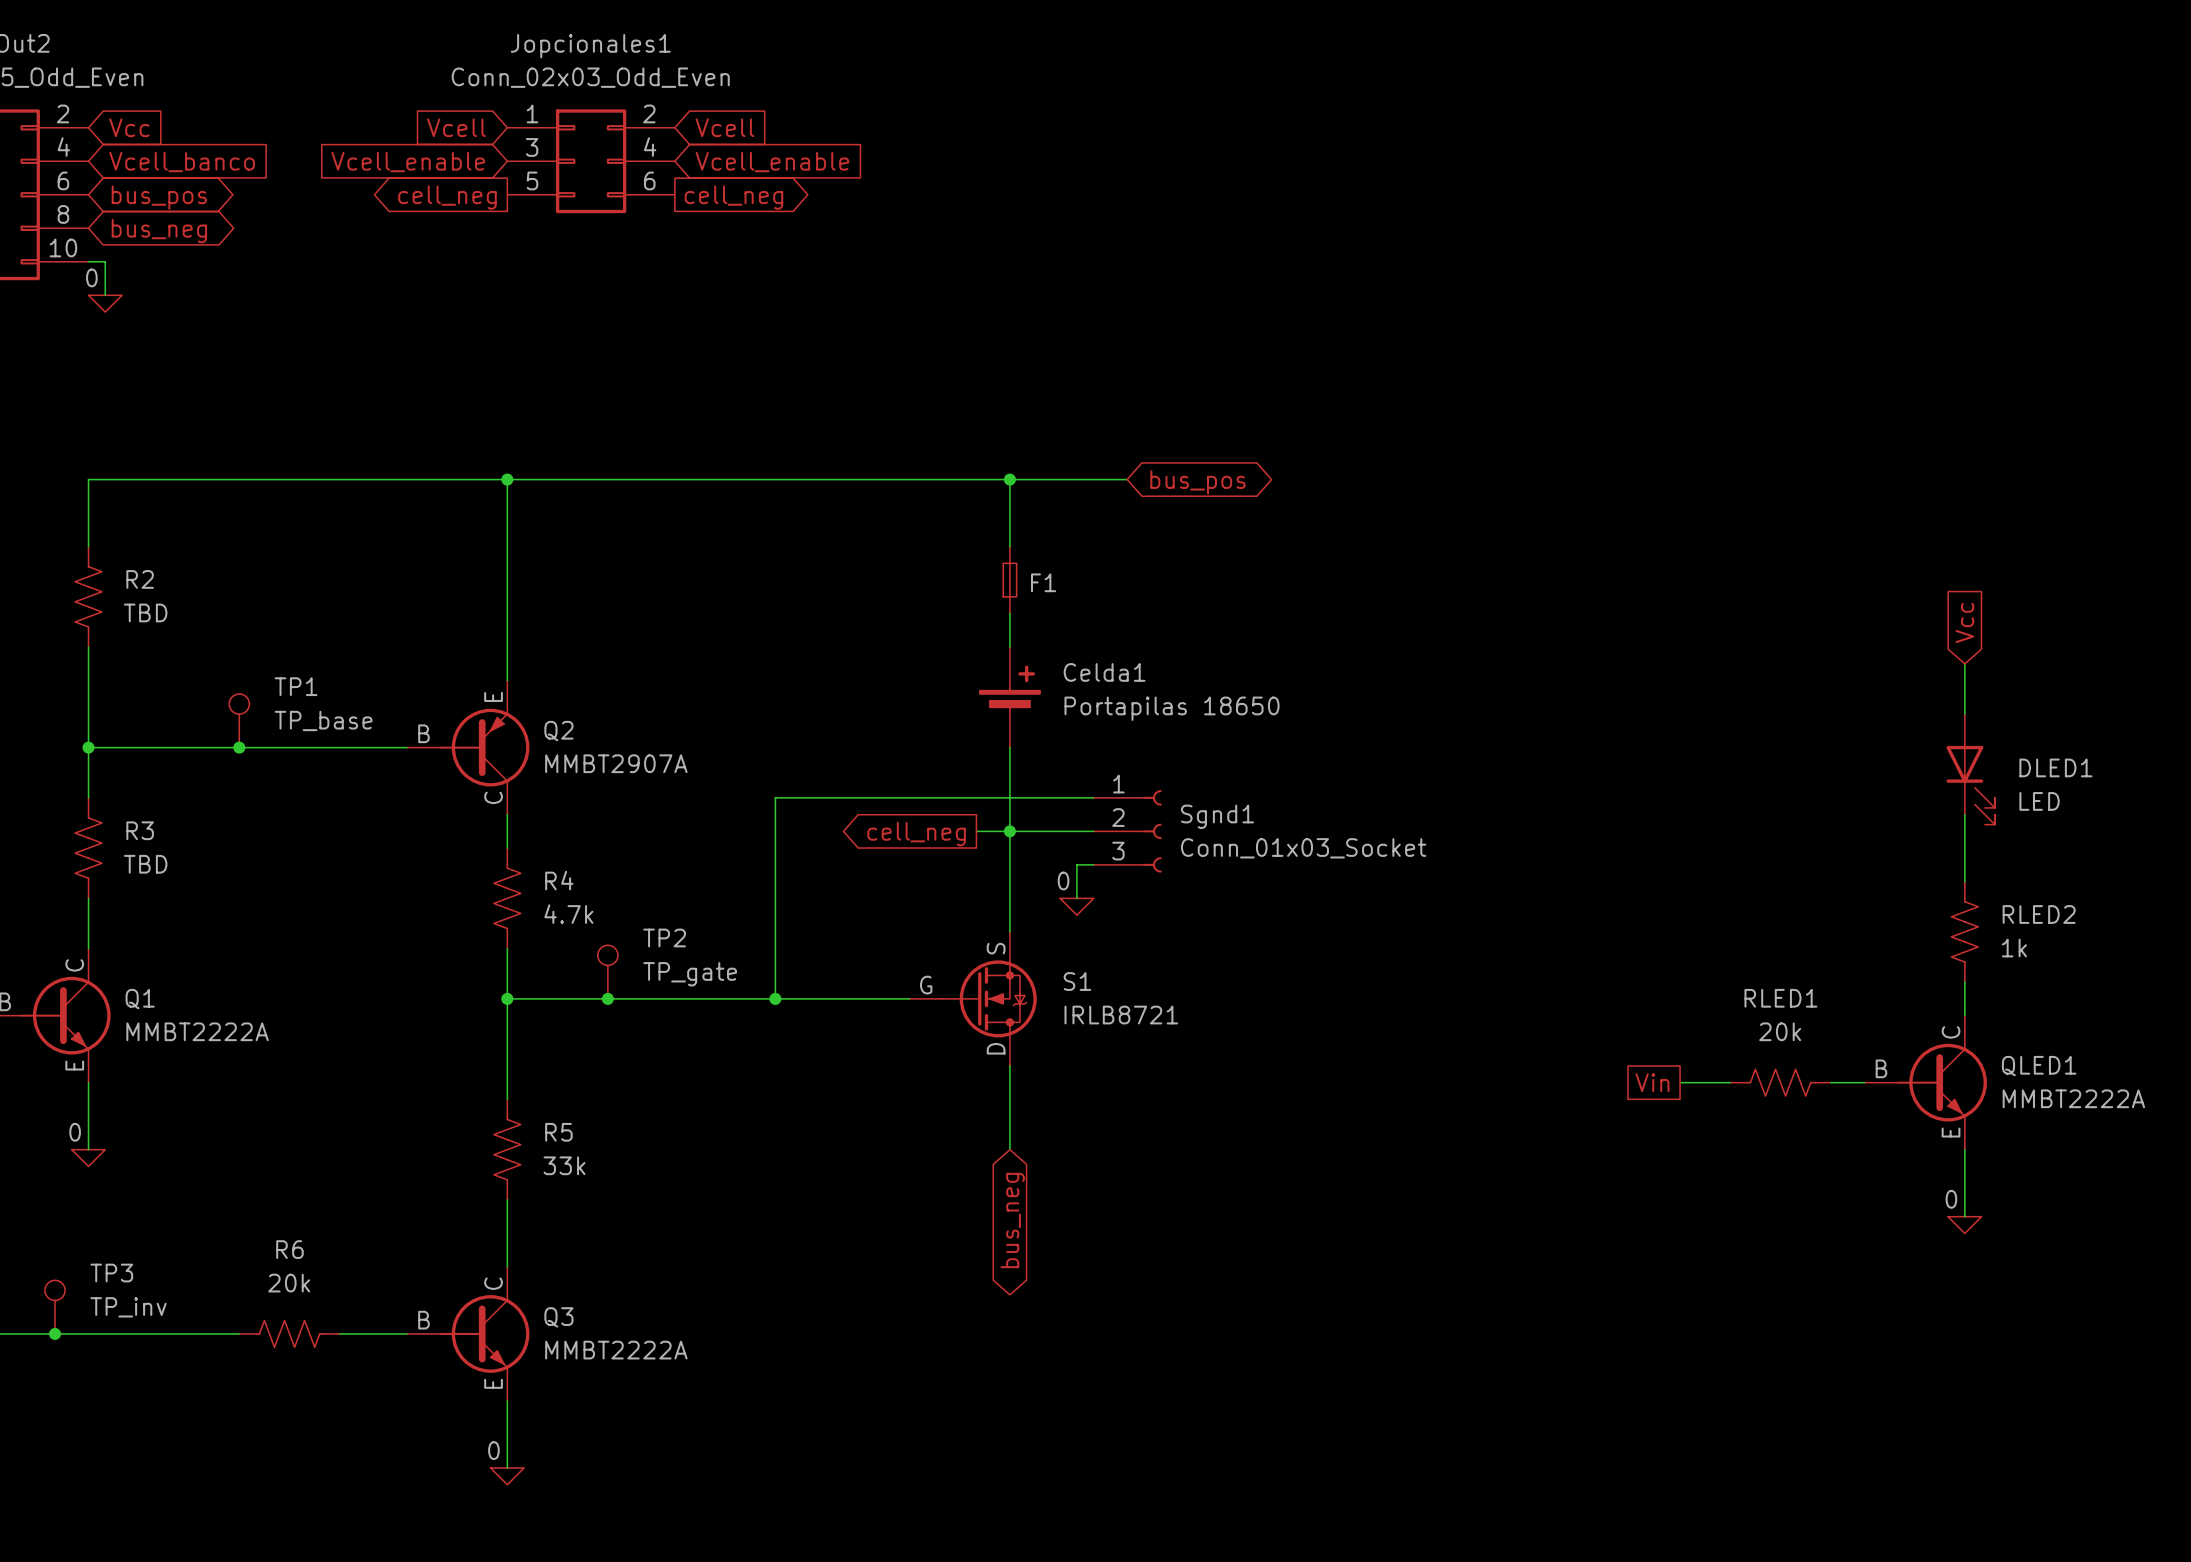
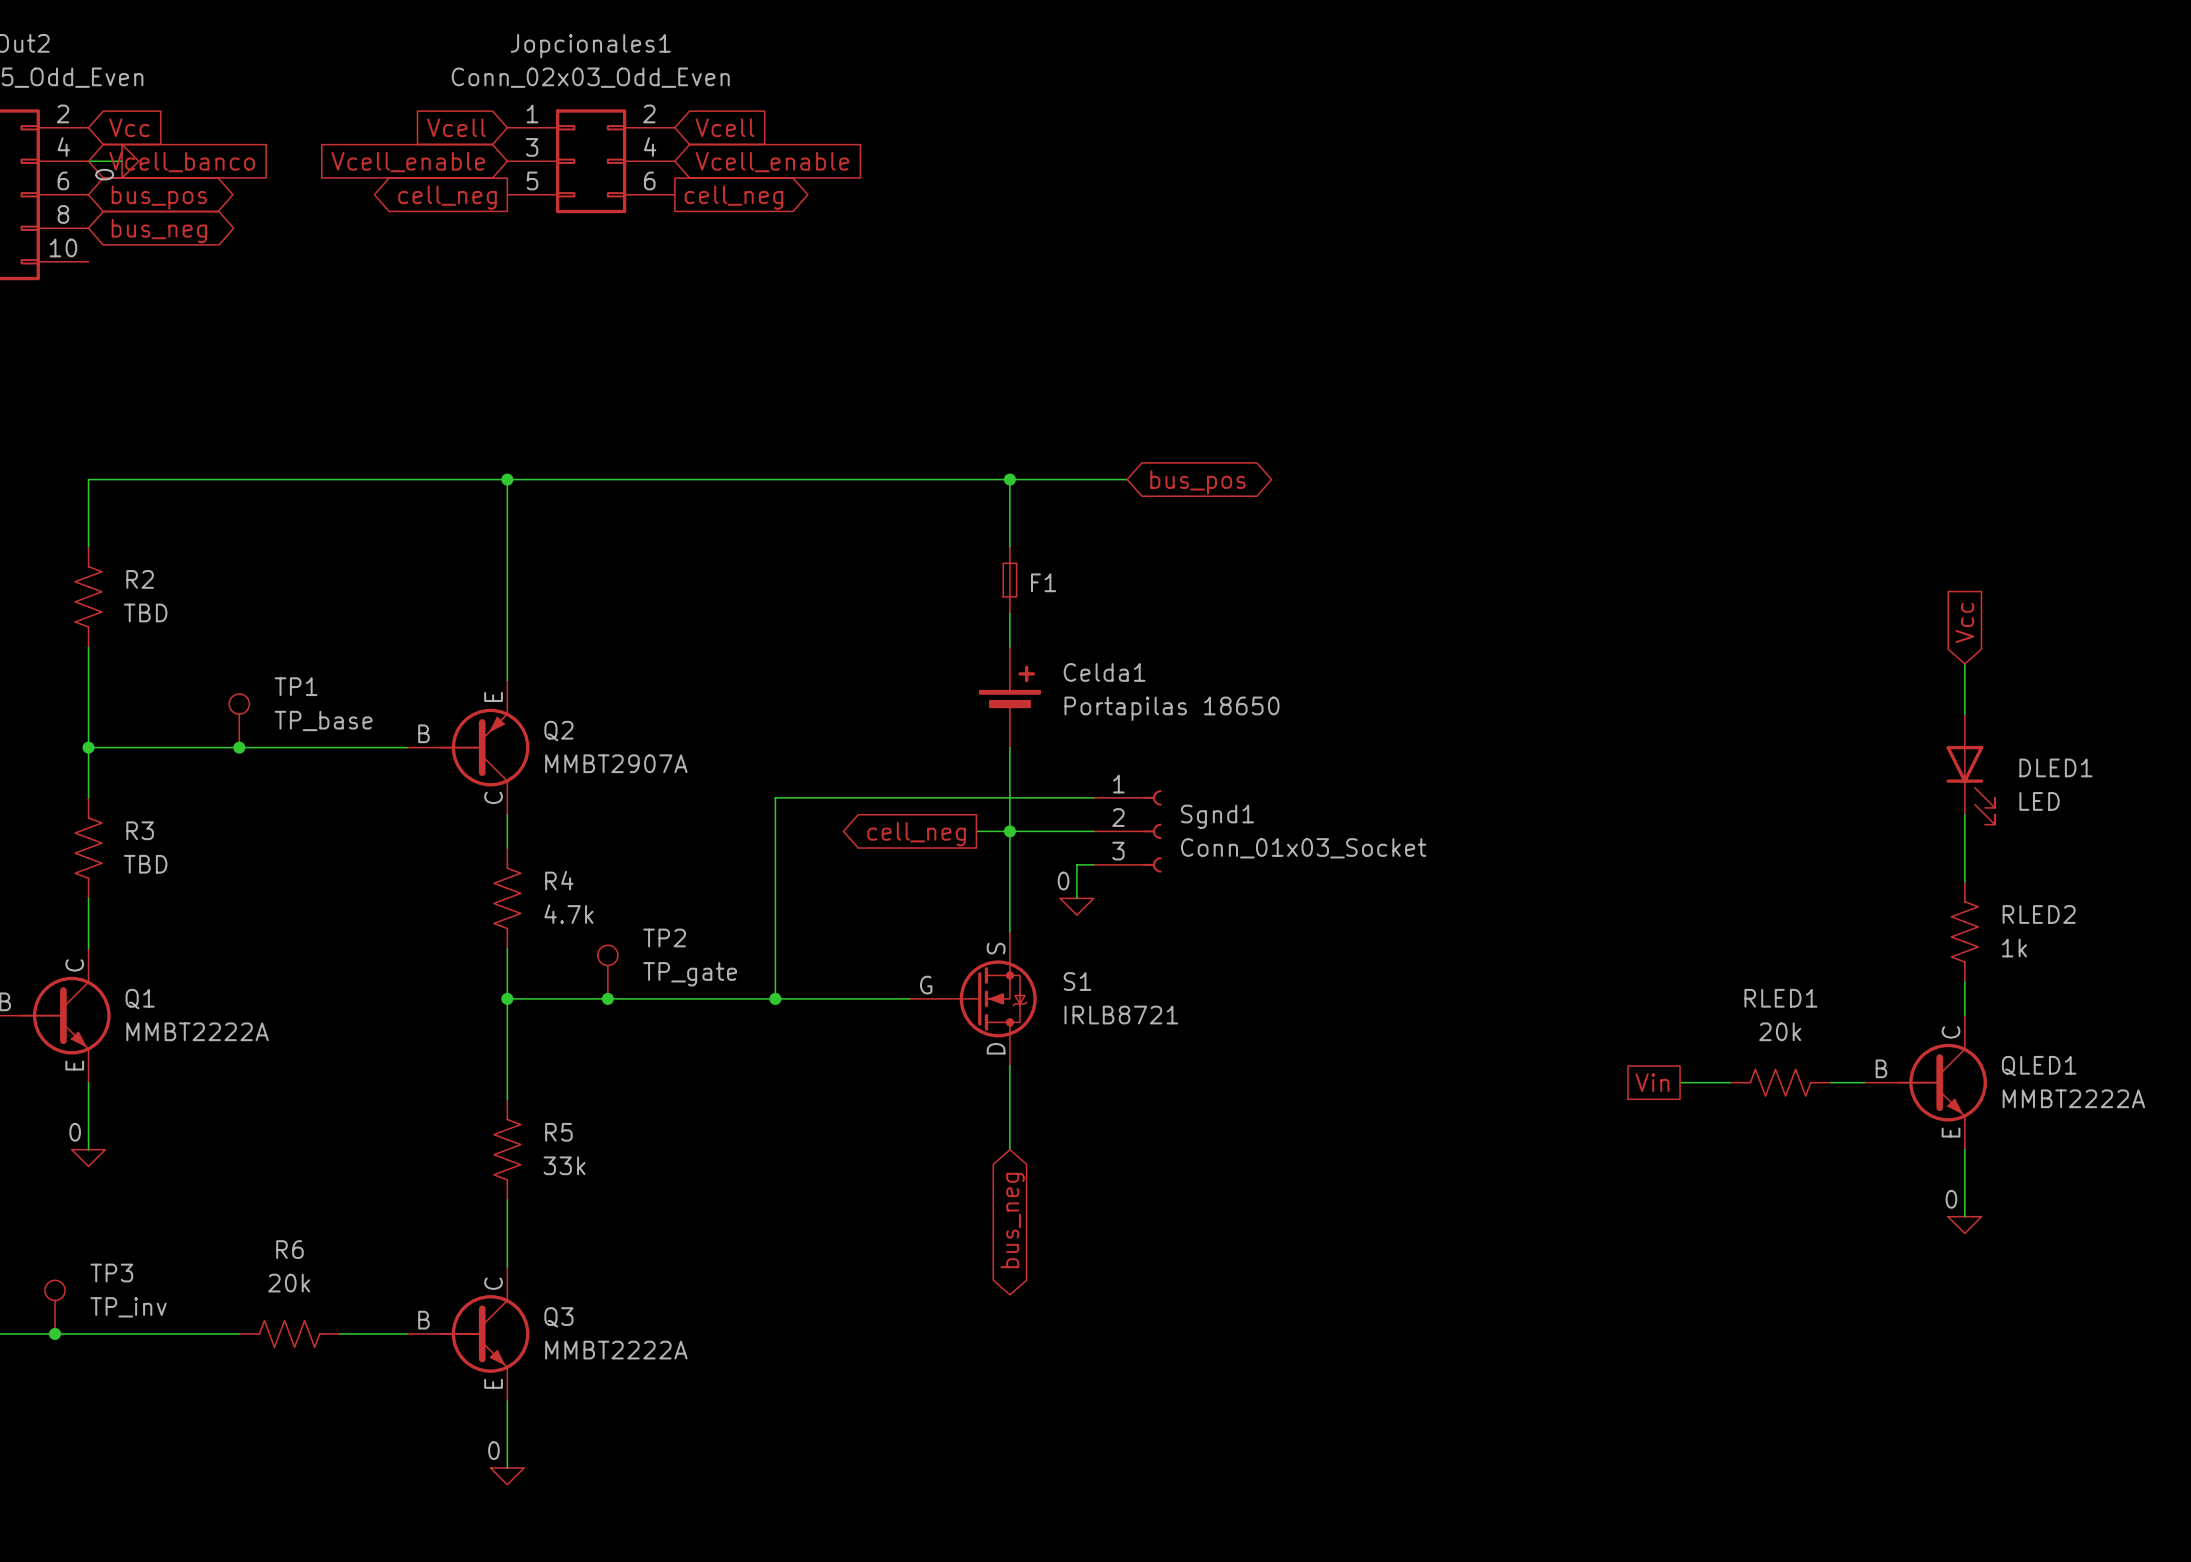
wire: none -> (88, 161) (122, 161)
wire: (88, 261) (105, 261) (105, 295) -> none
power symbol rotation: 0° (105, 303) -> 90° counterclockwise (130, 161)
power symbol position: 0 (105, 303) -> 0 (130, 161)

